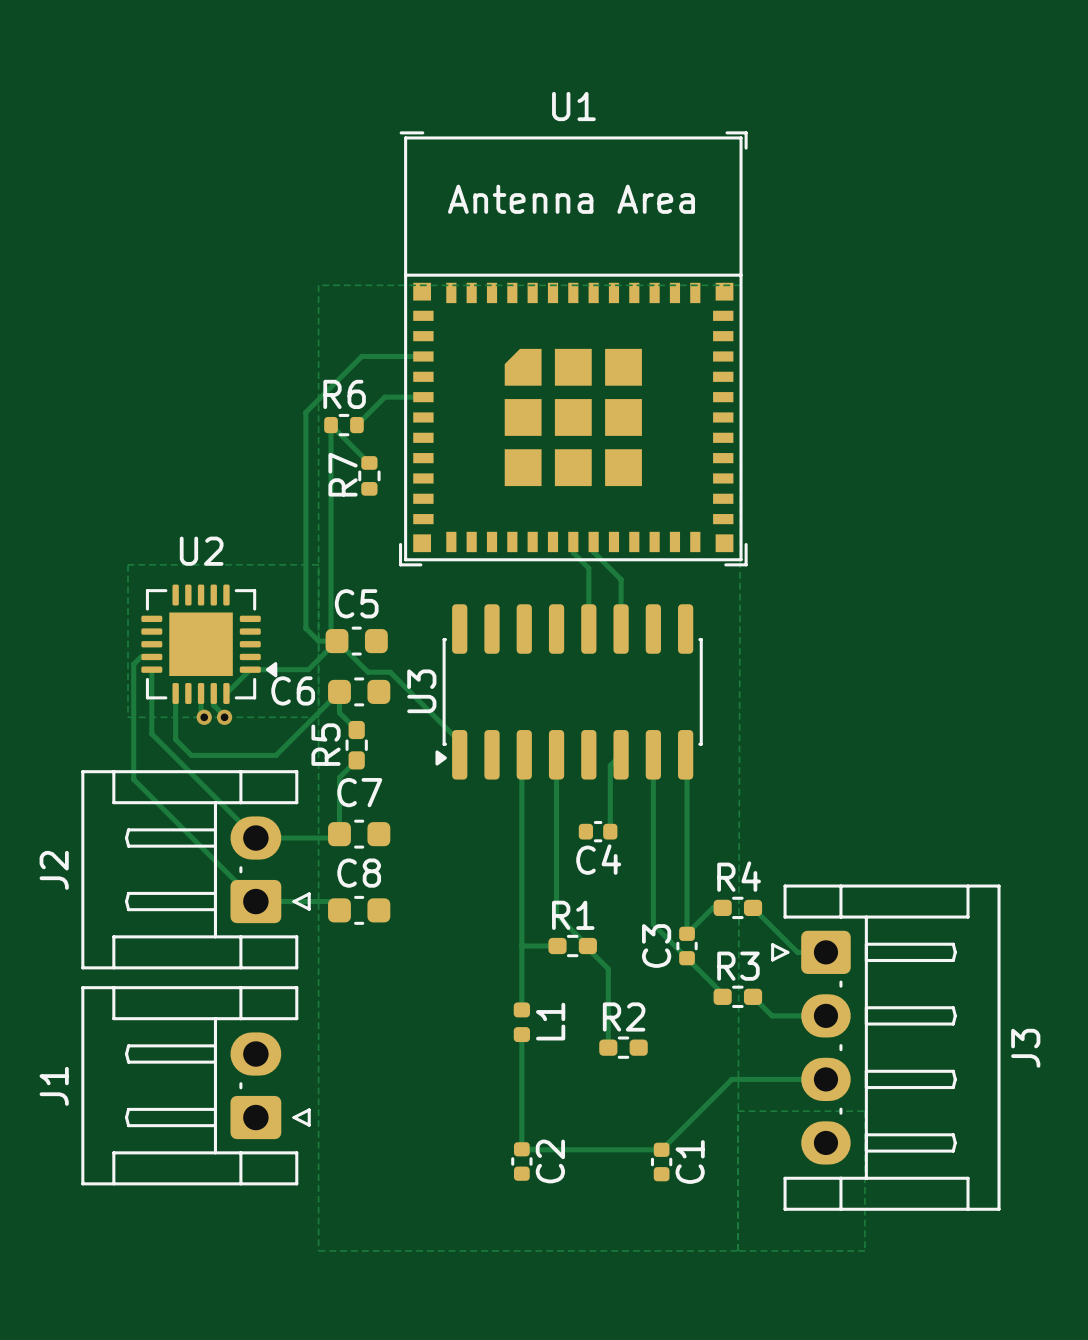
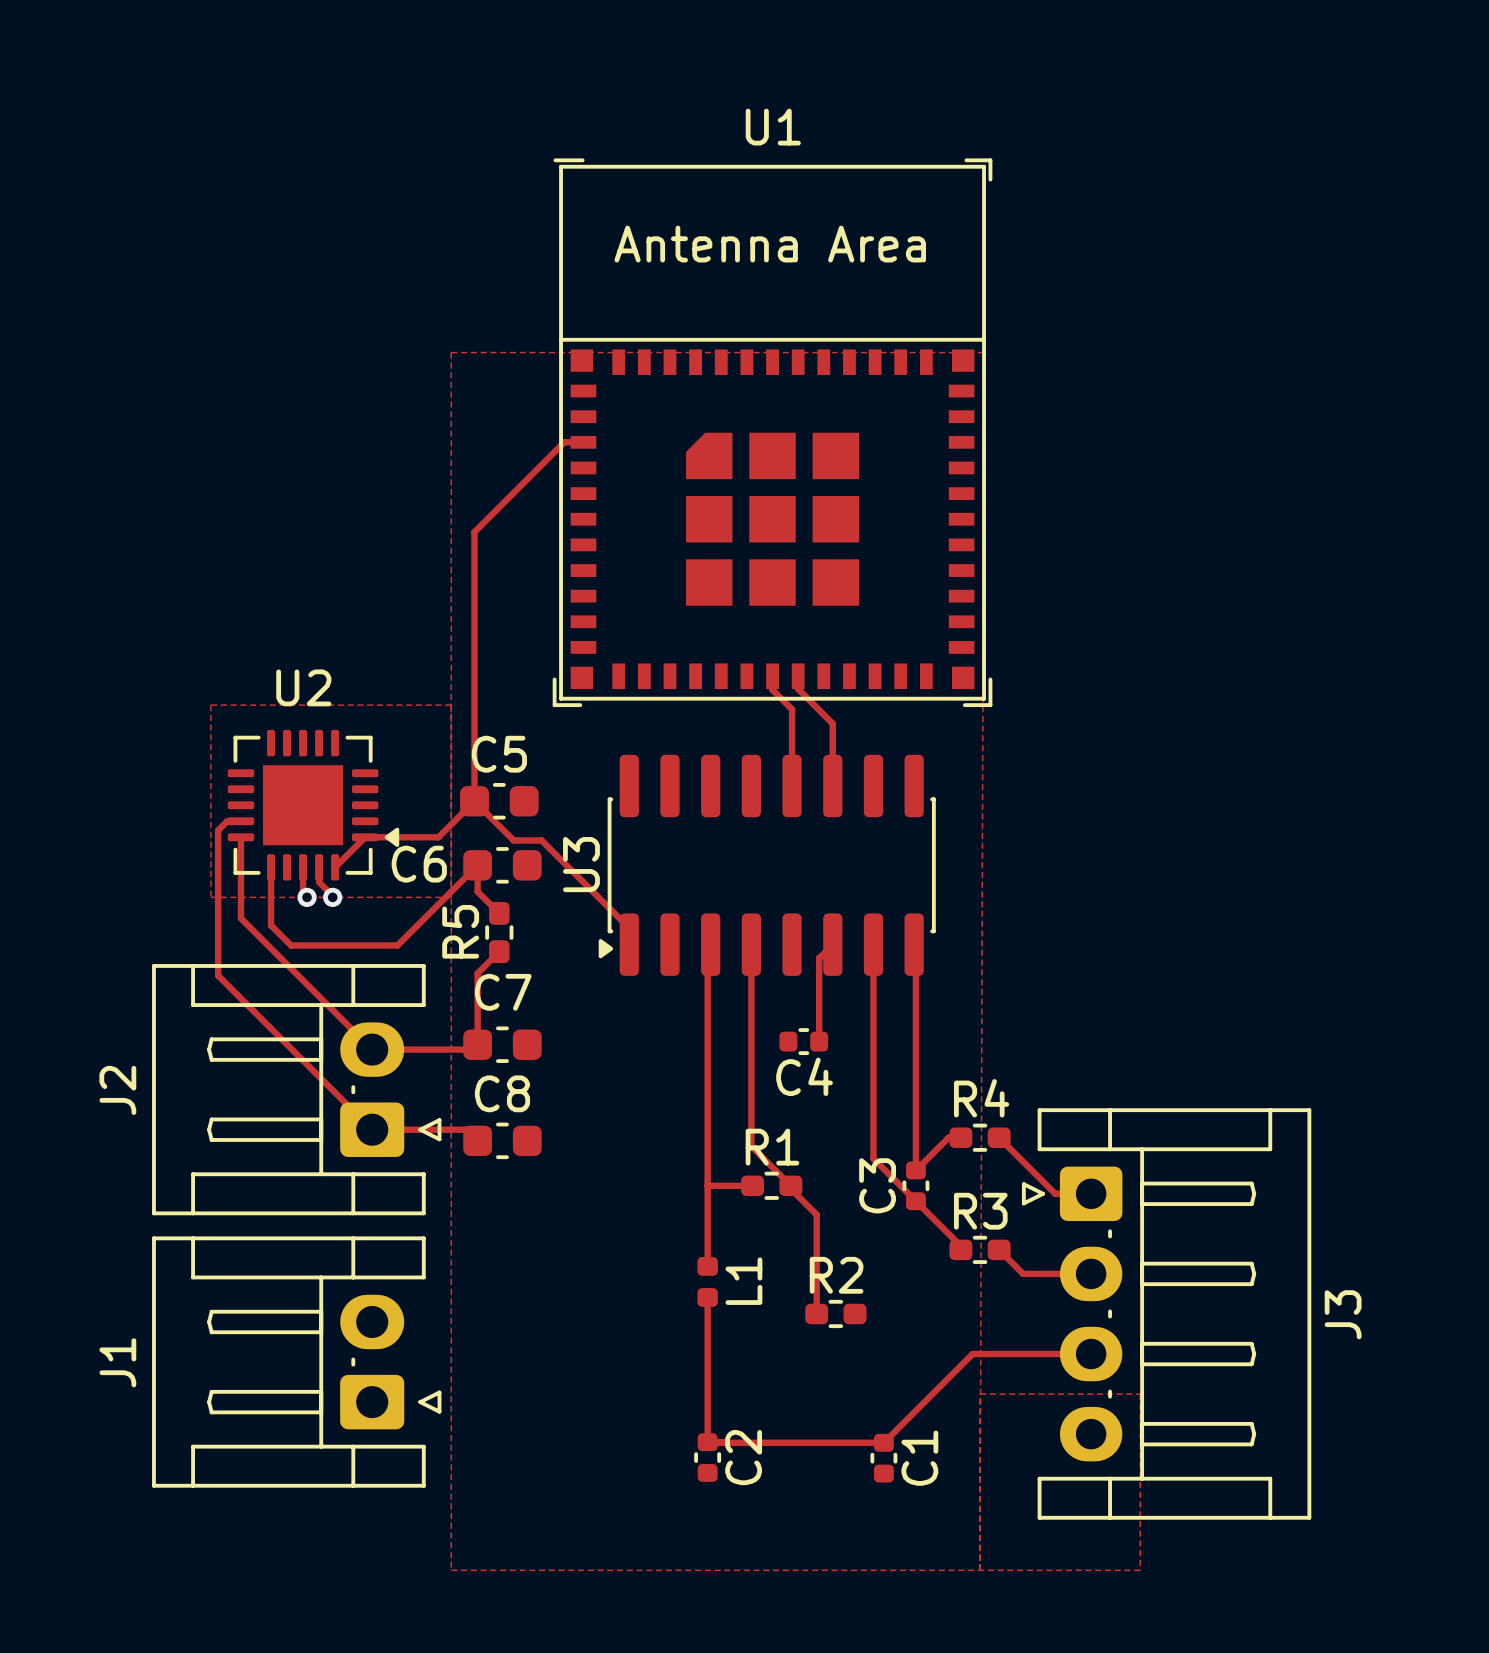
track: (408, 356) (361, 356) (305, 412) (305, 628) (318, 641) (337, 641) (331, 635) (331, 425) (368, 462) -> (564, 442) (474, 532) (474, 801)
track: (423, 397) (384, 397) (356, 425) -> none
R6: (343, 425) -> none
R7: (369, 475) -> none

